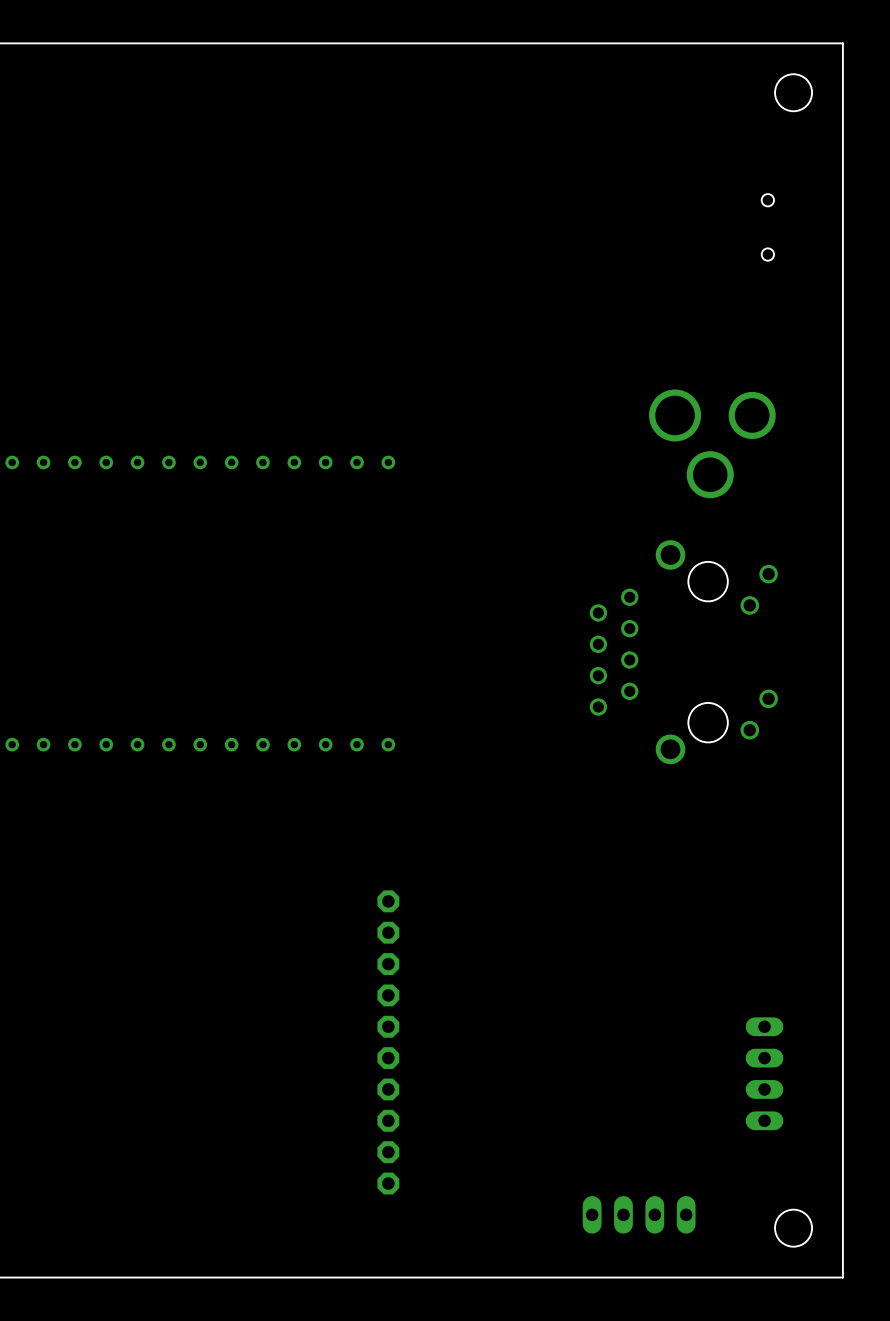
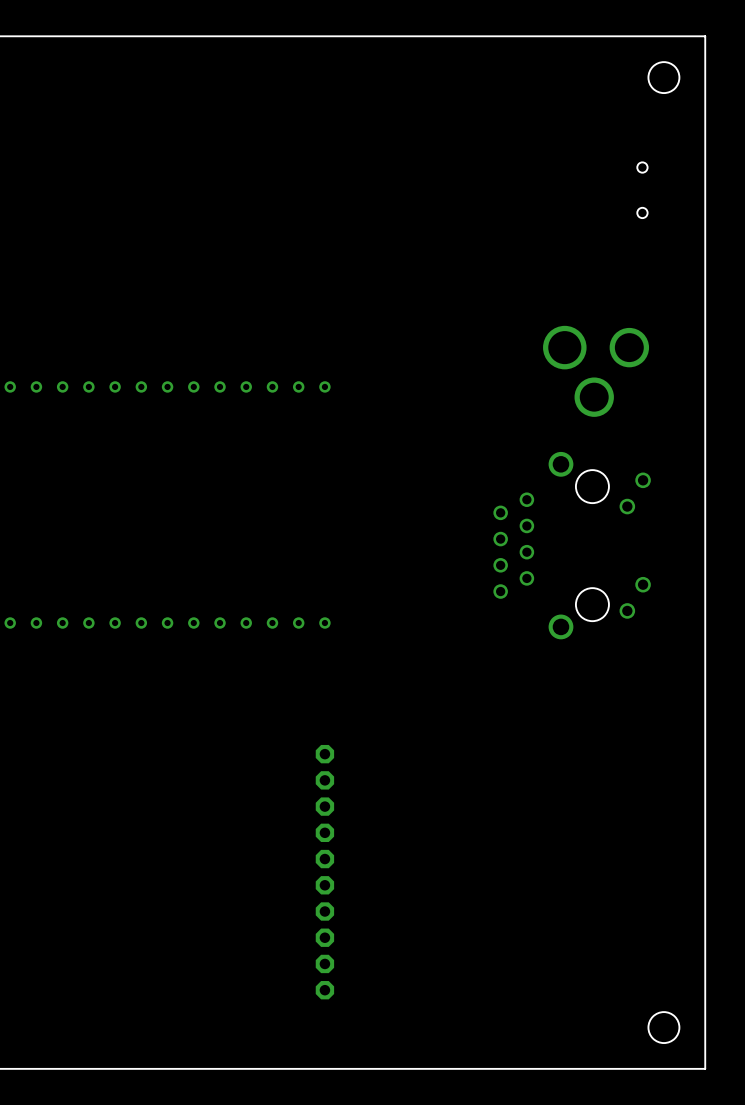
part: (764, 1073) -> none
part: (639, 1214) -> none

